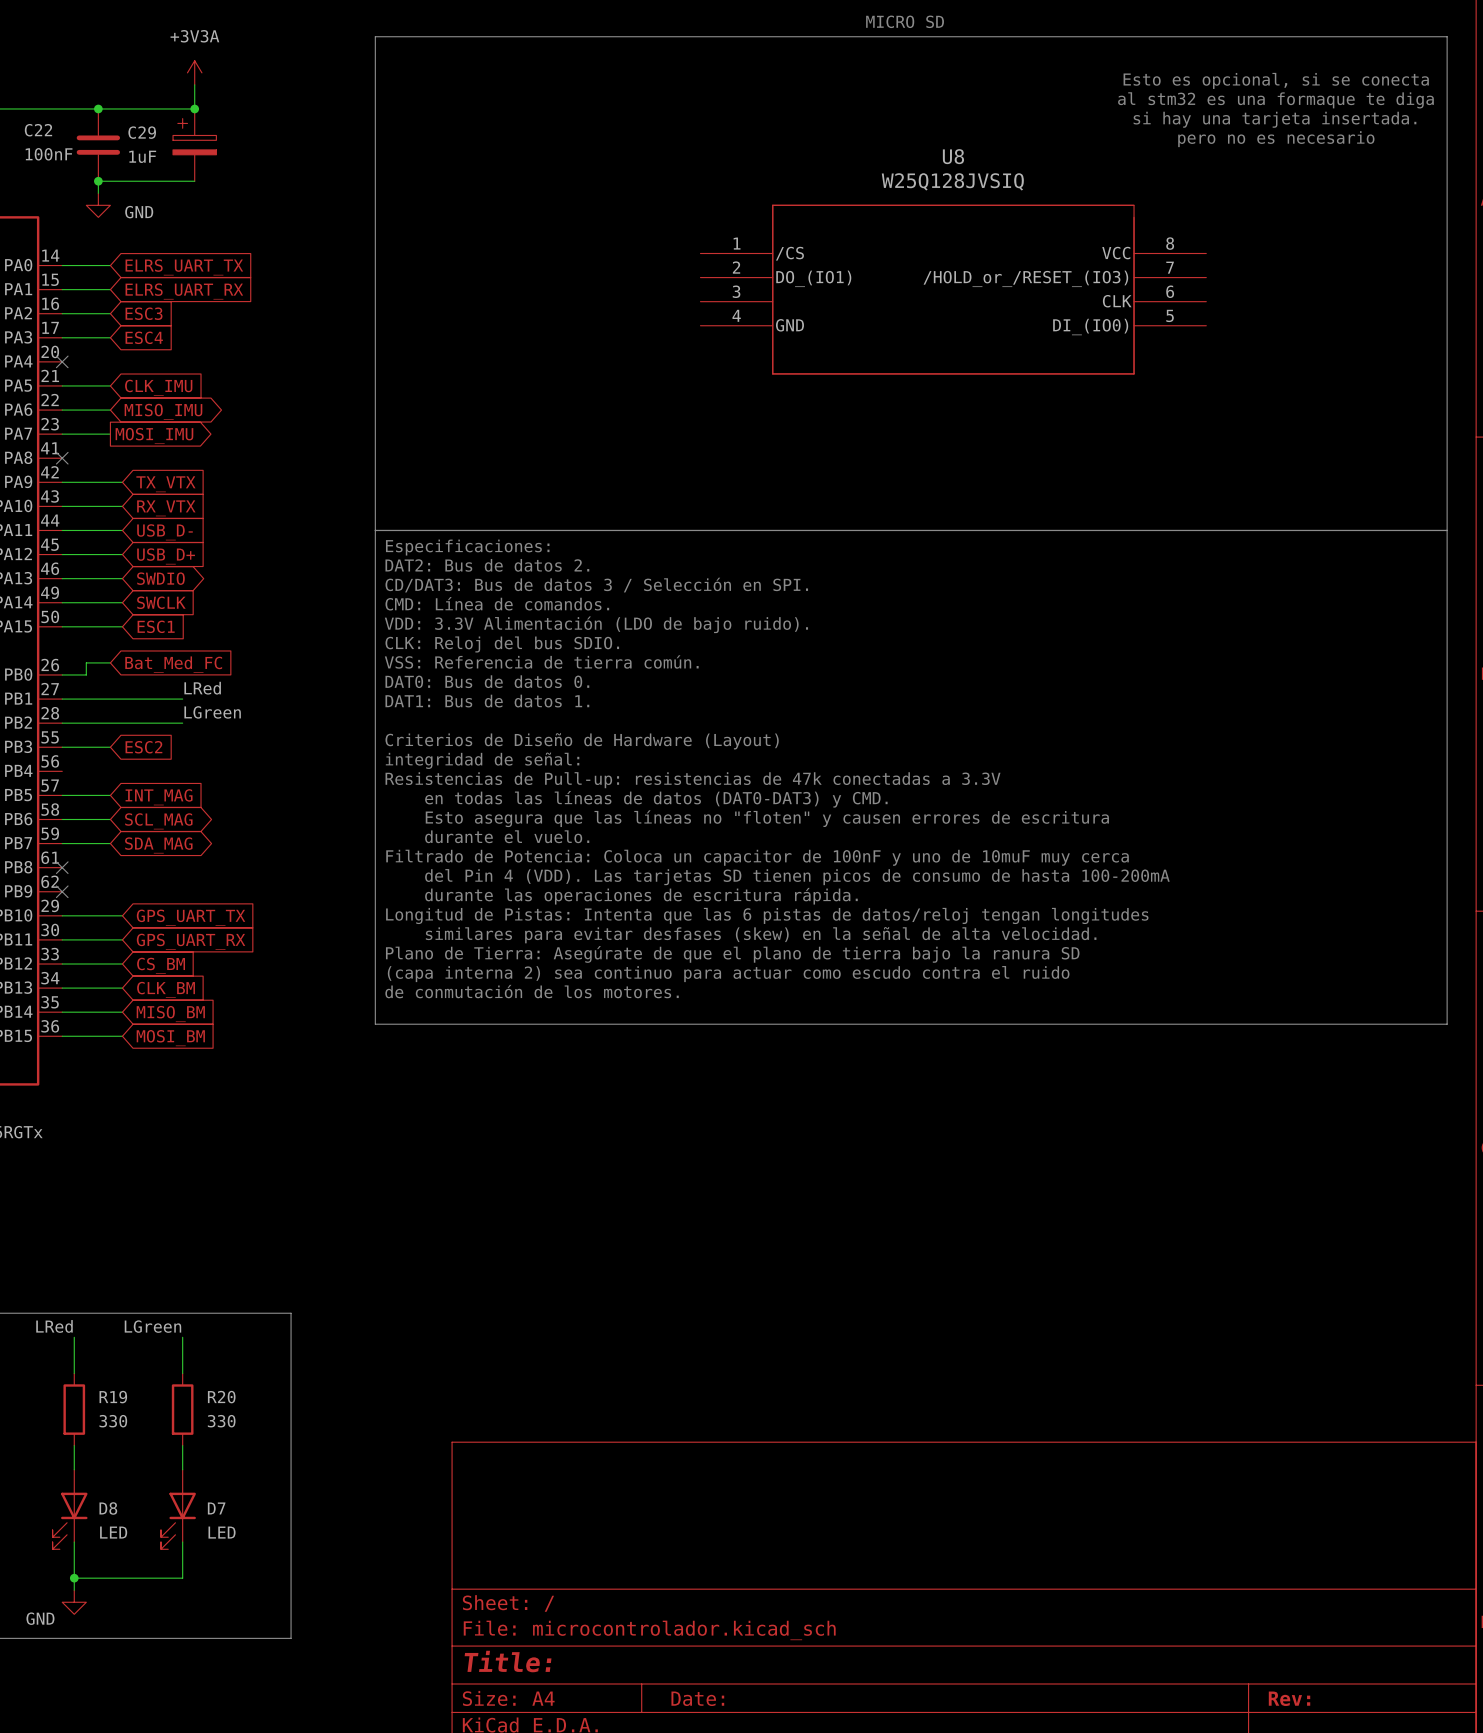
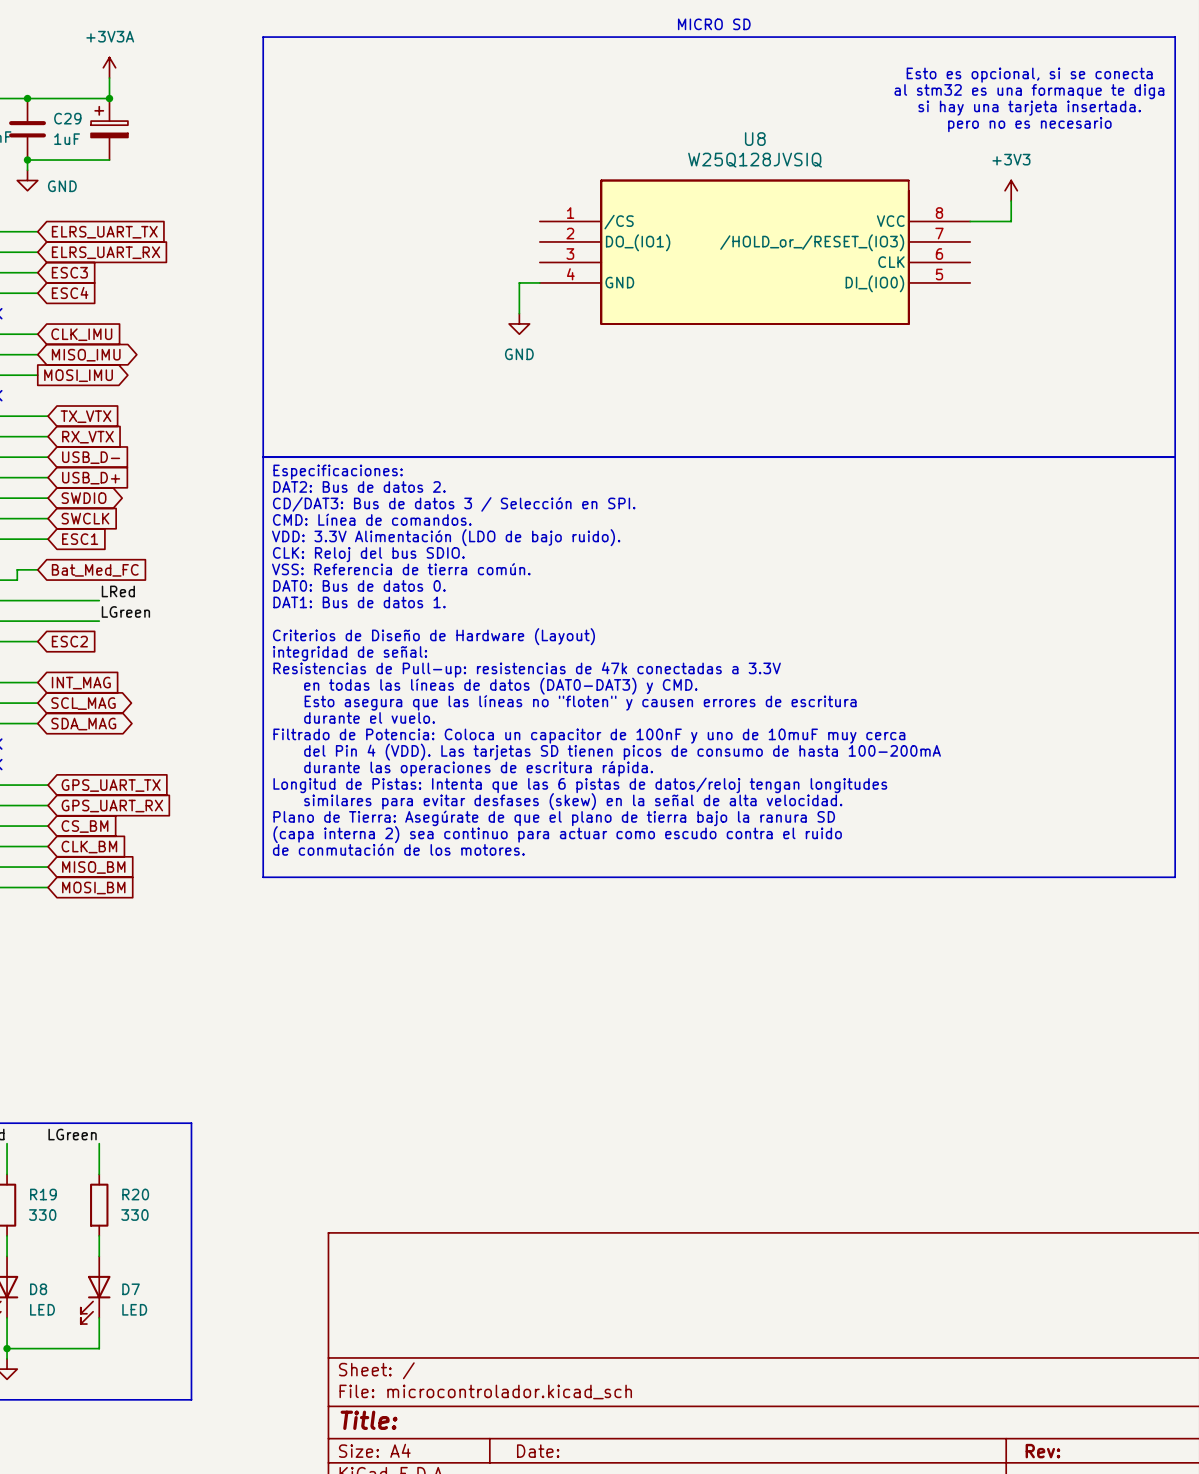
power symbol: none -> +3V3 (1011, 190)
wire: none -> (1011, 200) (1011, 221) (970, 221)
wire: none -> (539, 282) (519, 282) (519, 313)
power symbol: none -> GND (519, 323)

